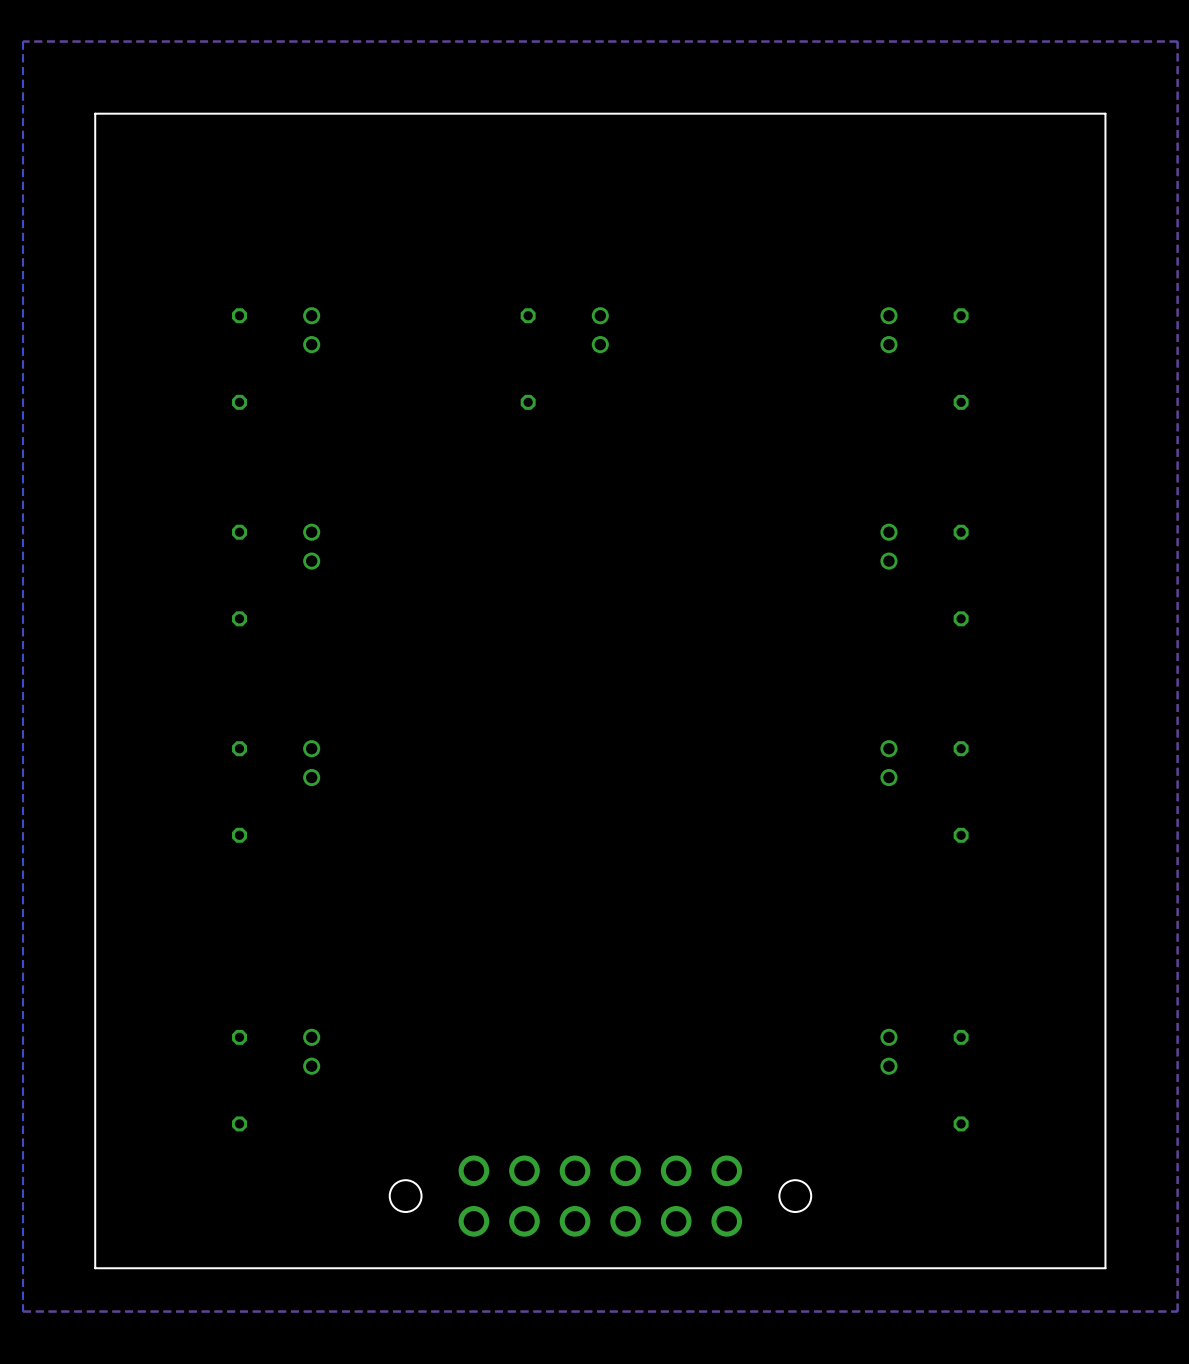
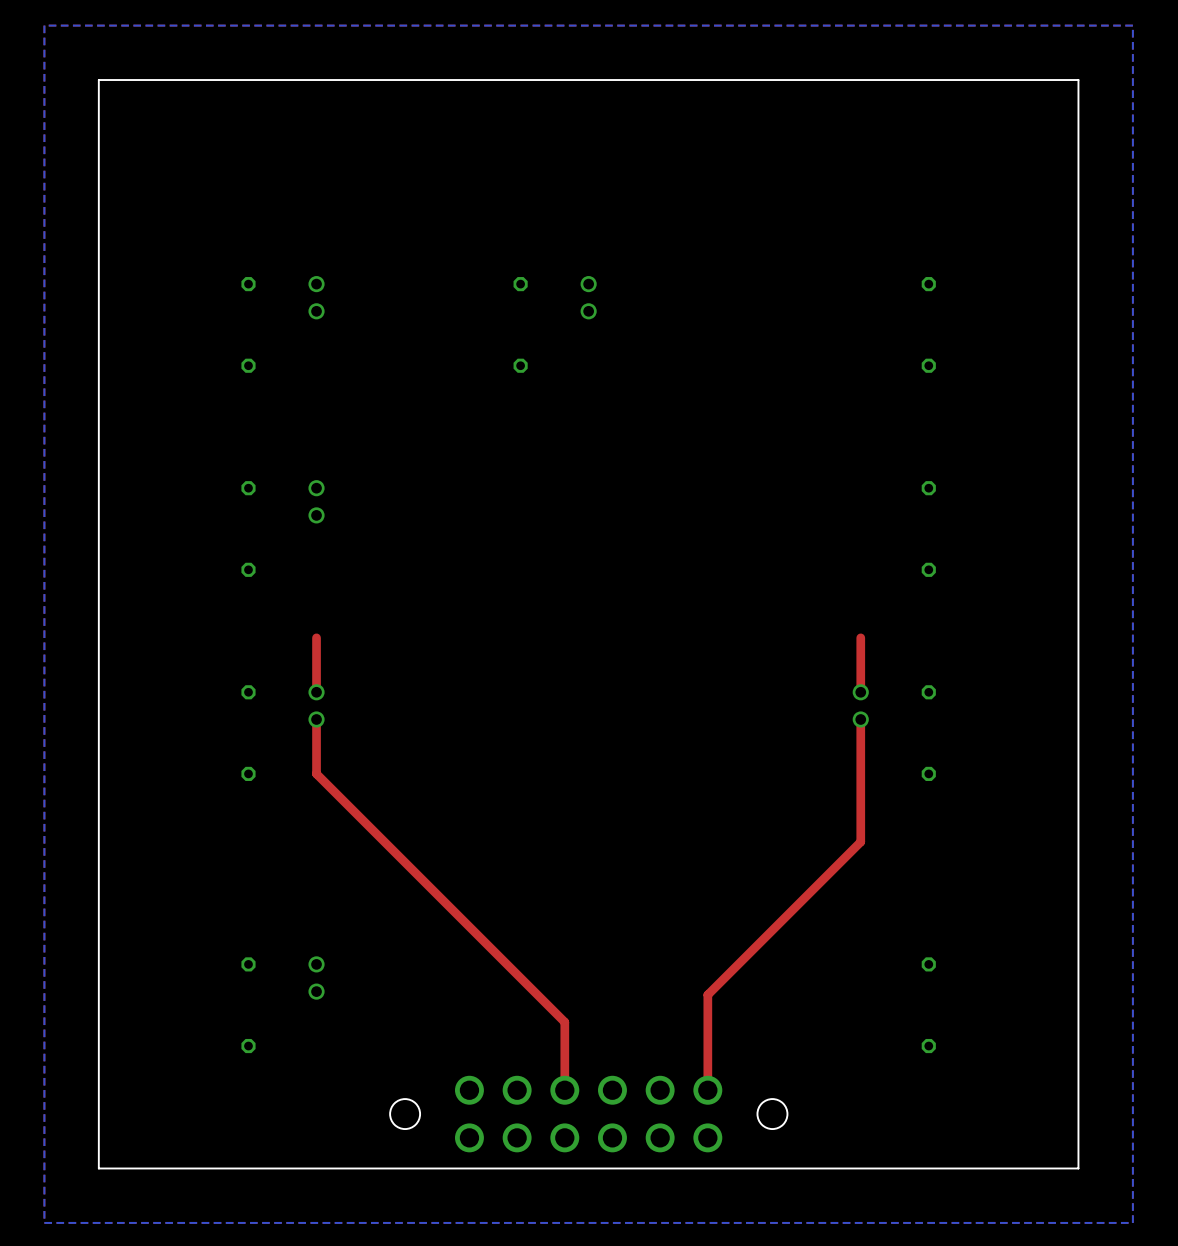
board edge: (1105, 113) (95, 113) (95, 1268) (1105, 1268) (1105, 113) -> (1078, 80) (1078, 1168) (98, 1168) (98, 80) (1078, 80)
part: (888, 330) -> none
part: (888, 546) -> none
top track: none -> (316, 637) (316, 692)
top track: none -> (860, 637) (860, 692)
top track: none -> (316, 719) (316, 773) (564, 1022) (564, 1090)
top track: none -> (860, 719) (860, 841) (707, 994) (707, 1090)
part: (888, 1051) -> none

